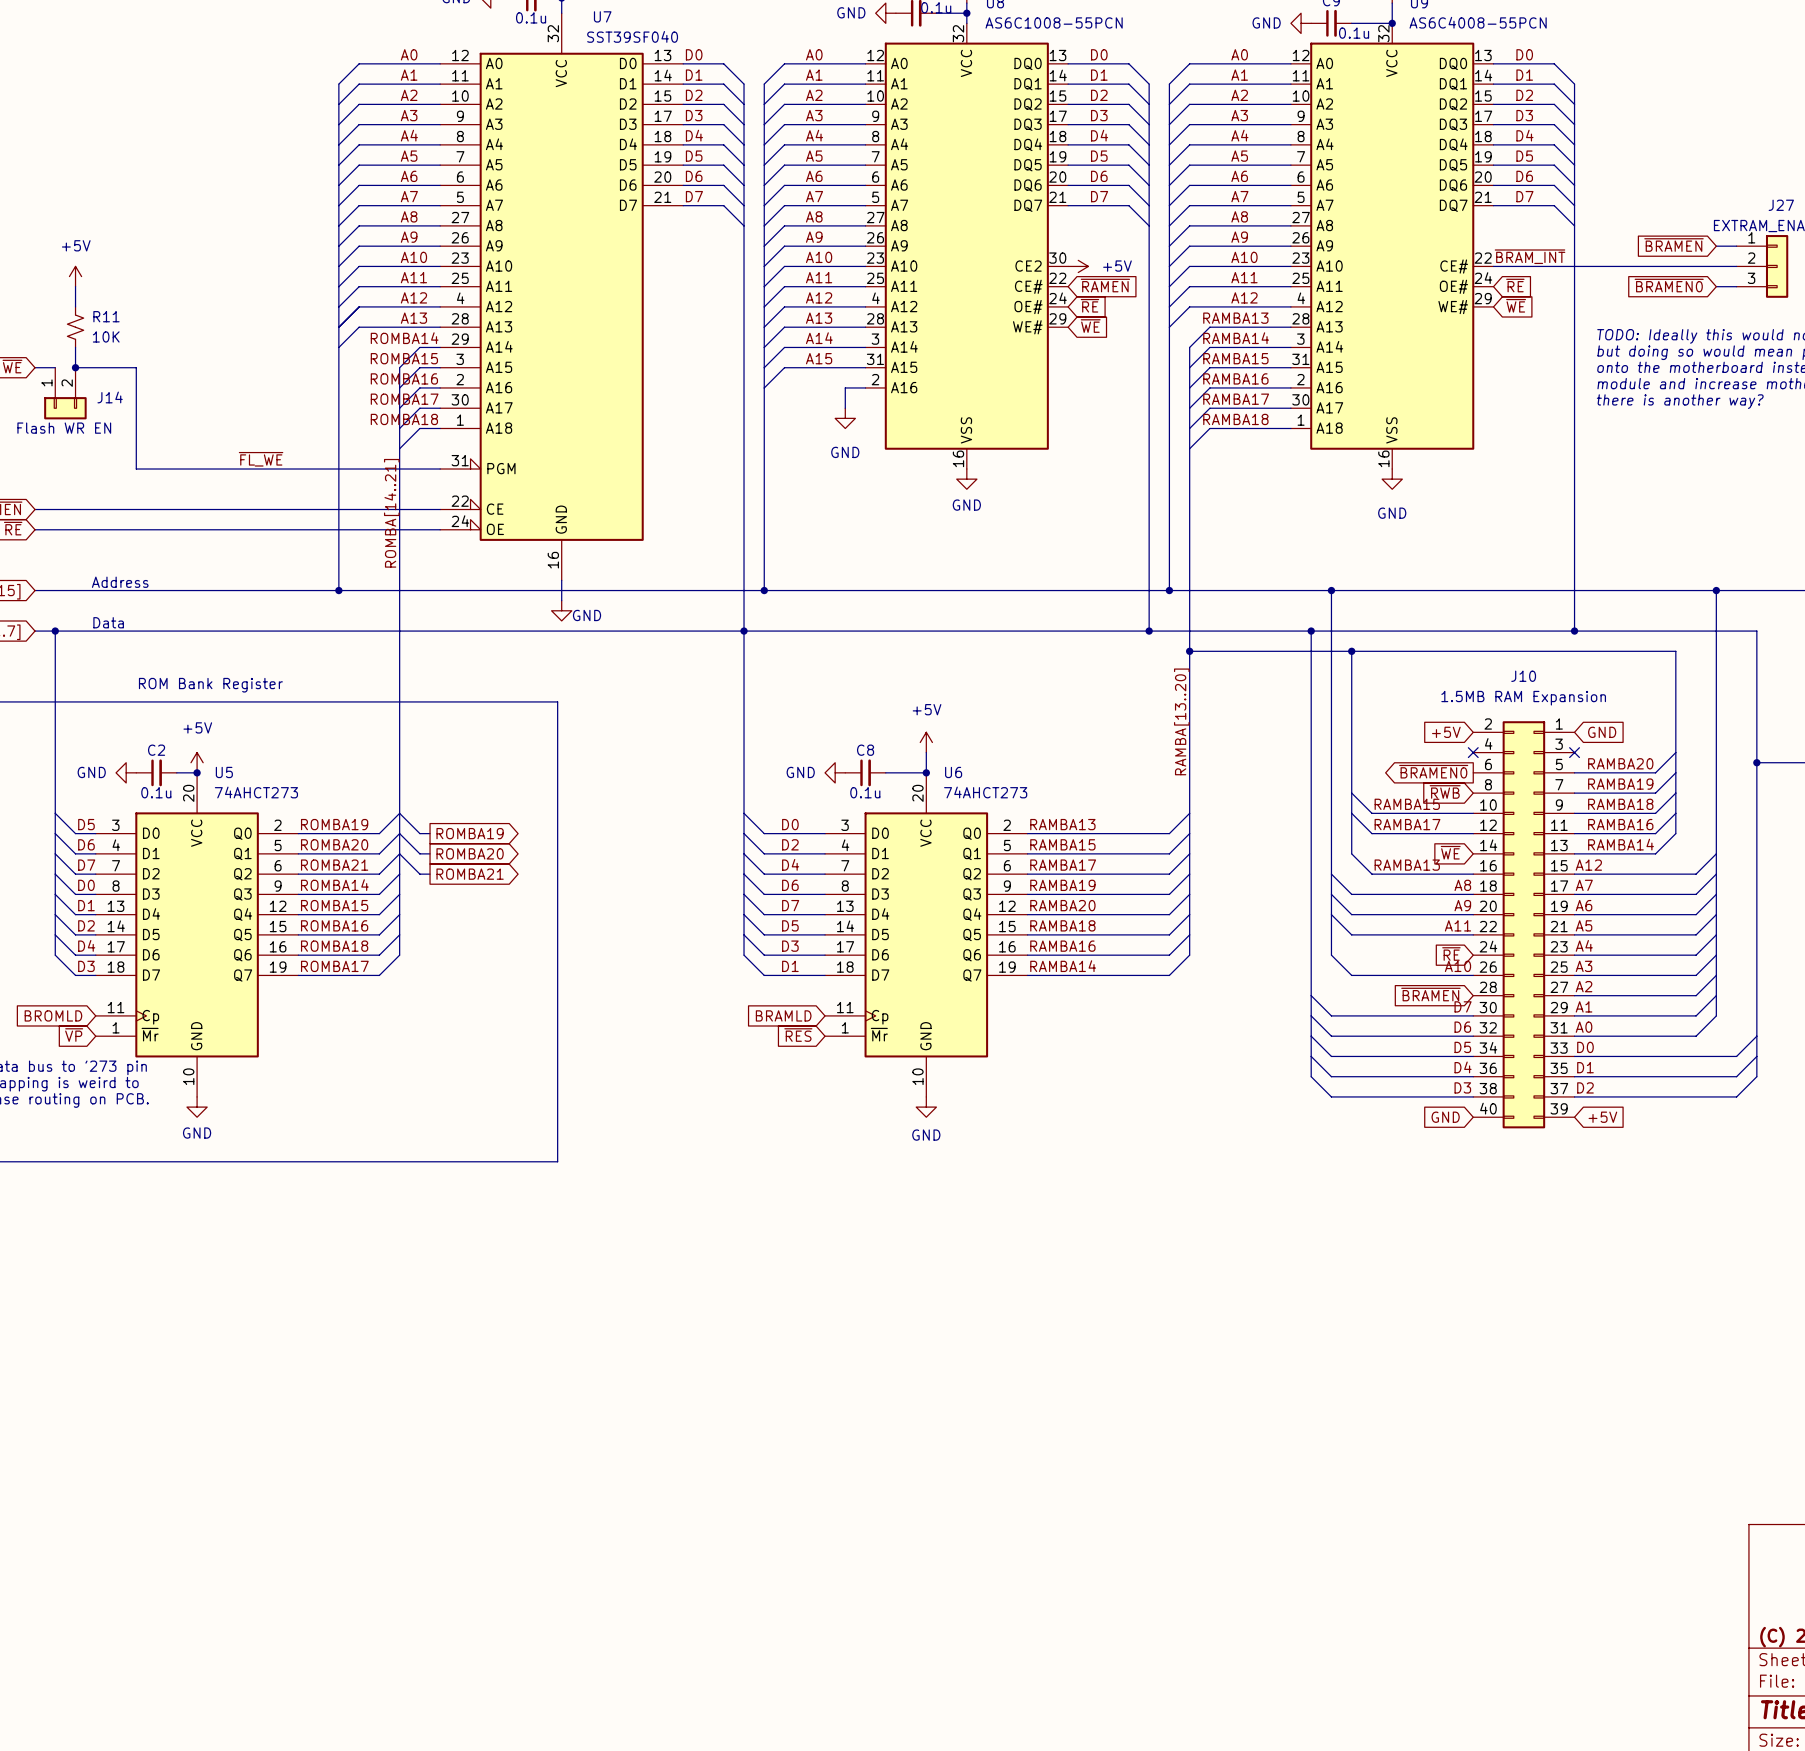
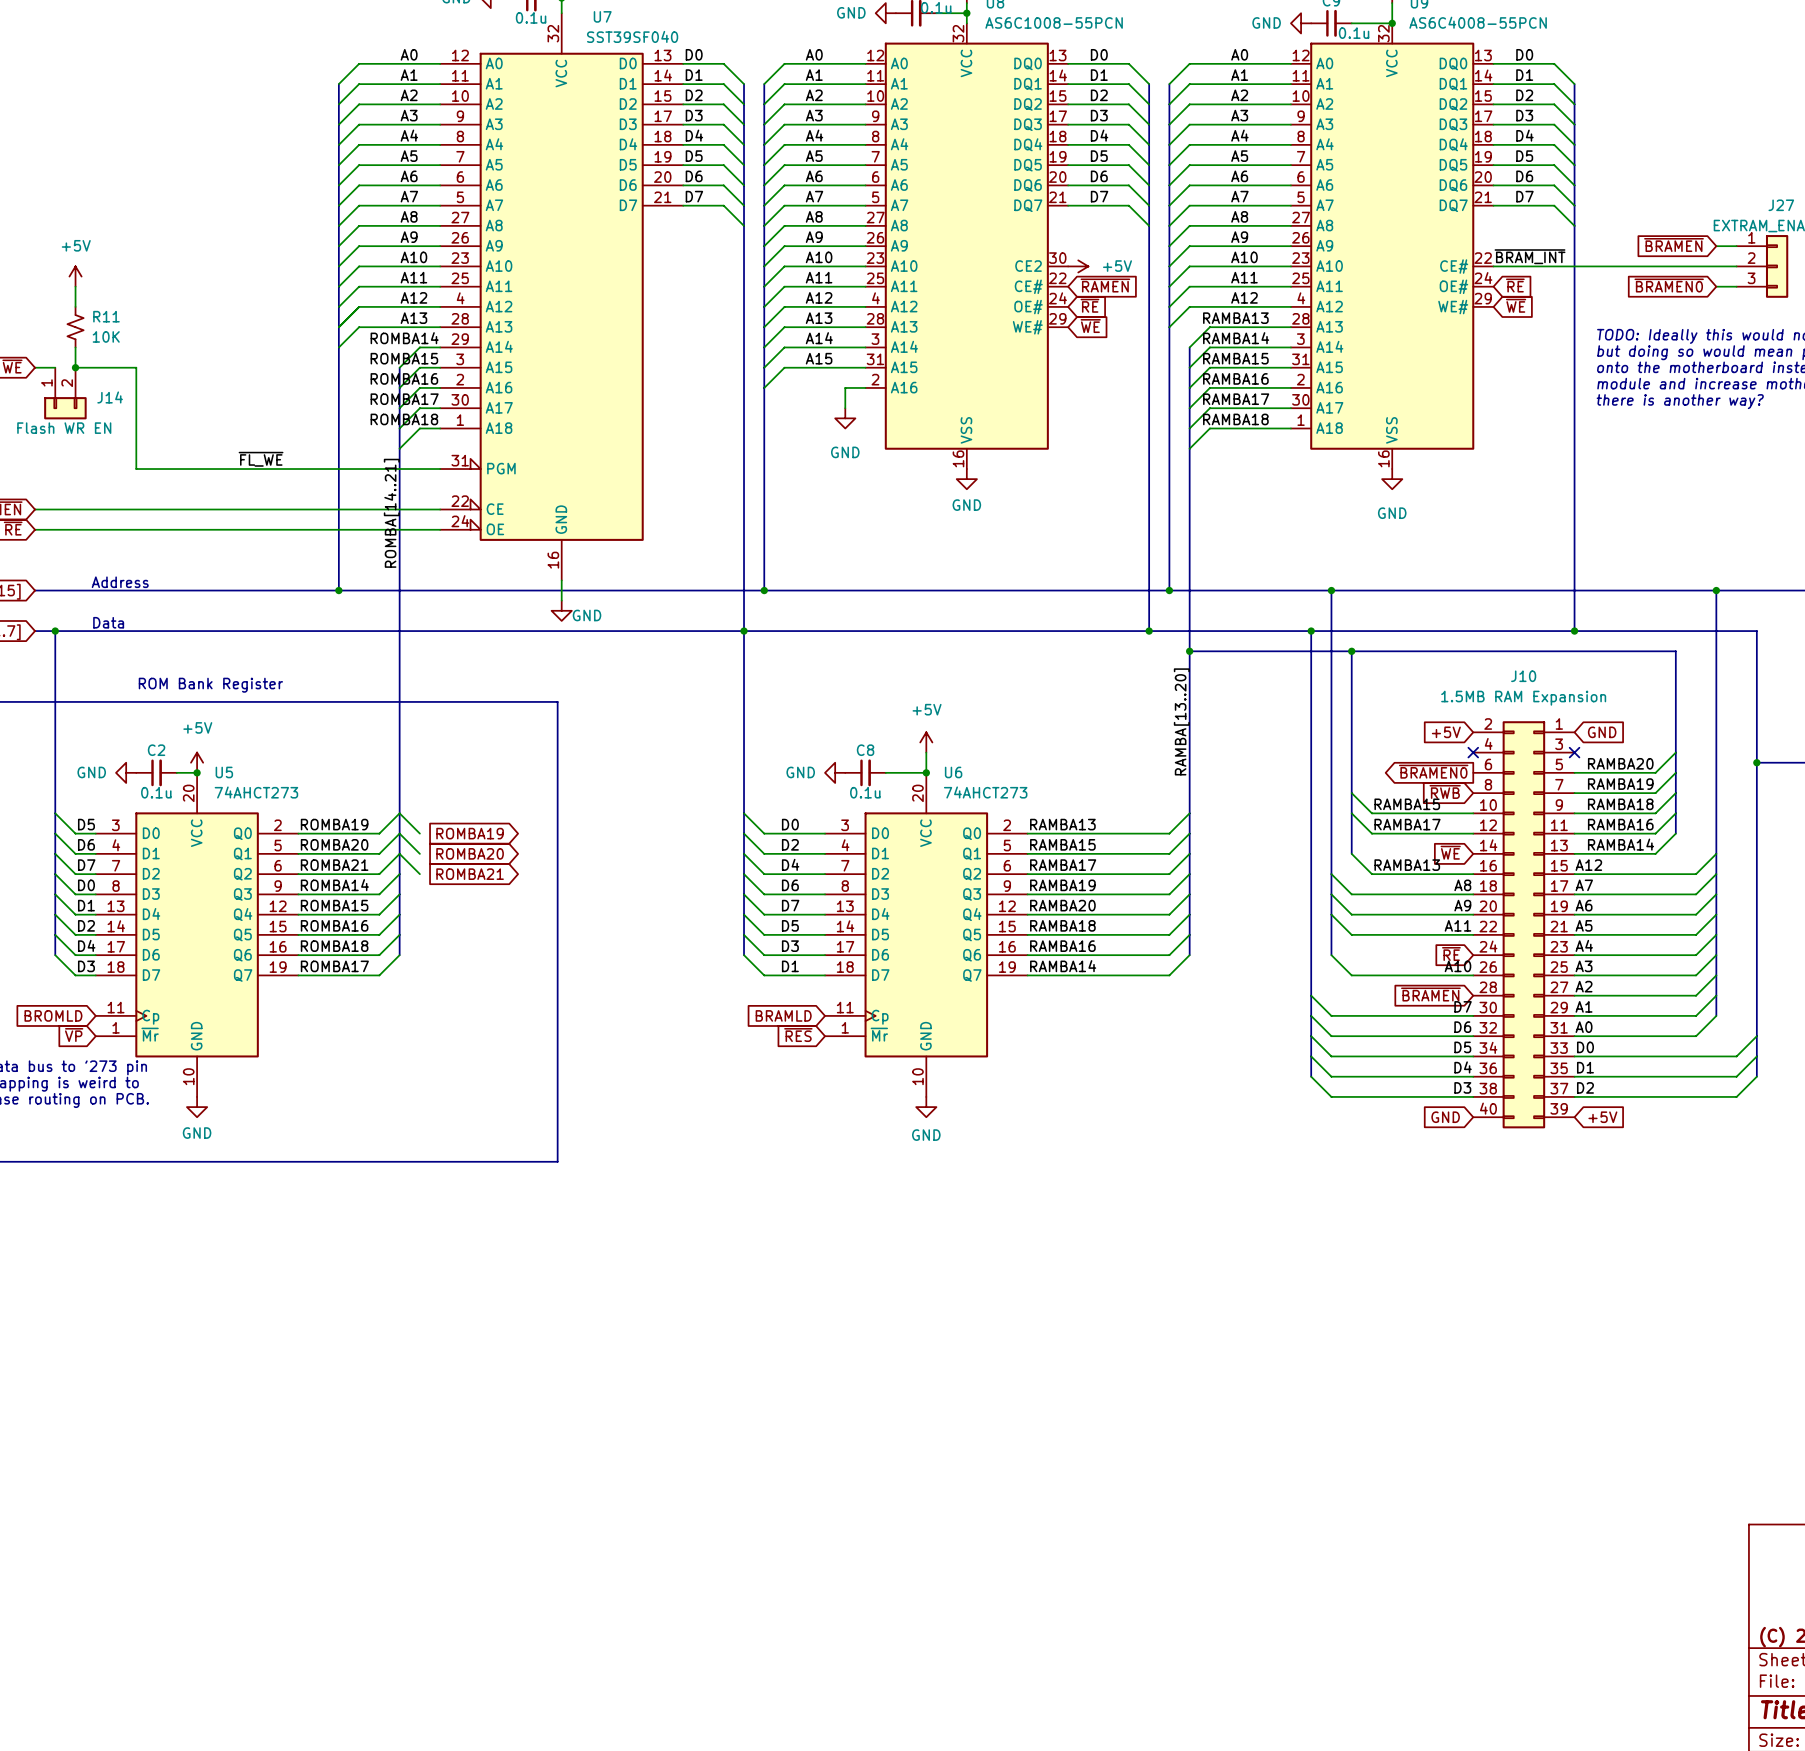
wire: (419, 833) (430, 833) -> none
wire: (419, 853) (430, 853) -> none
wire: (419, 874) (430, 874) -> none

